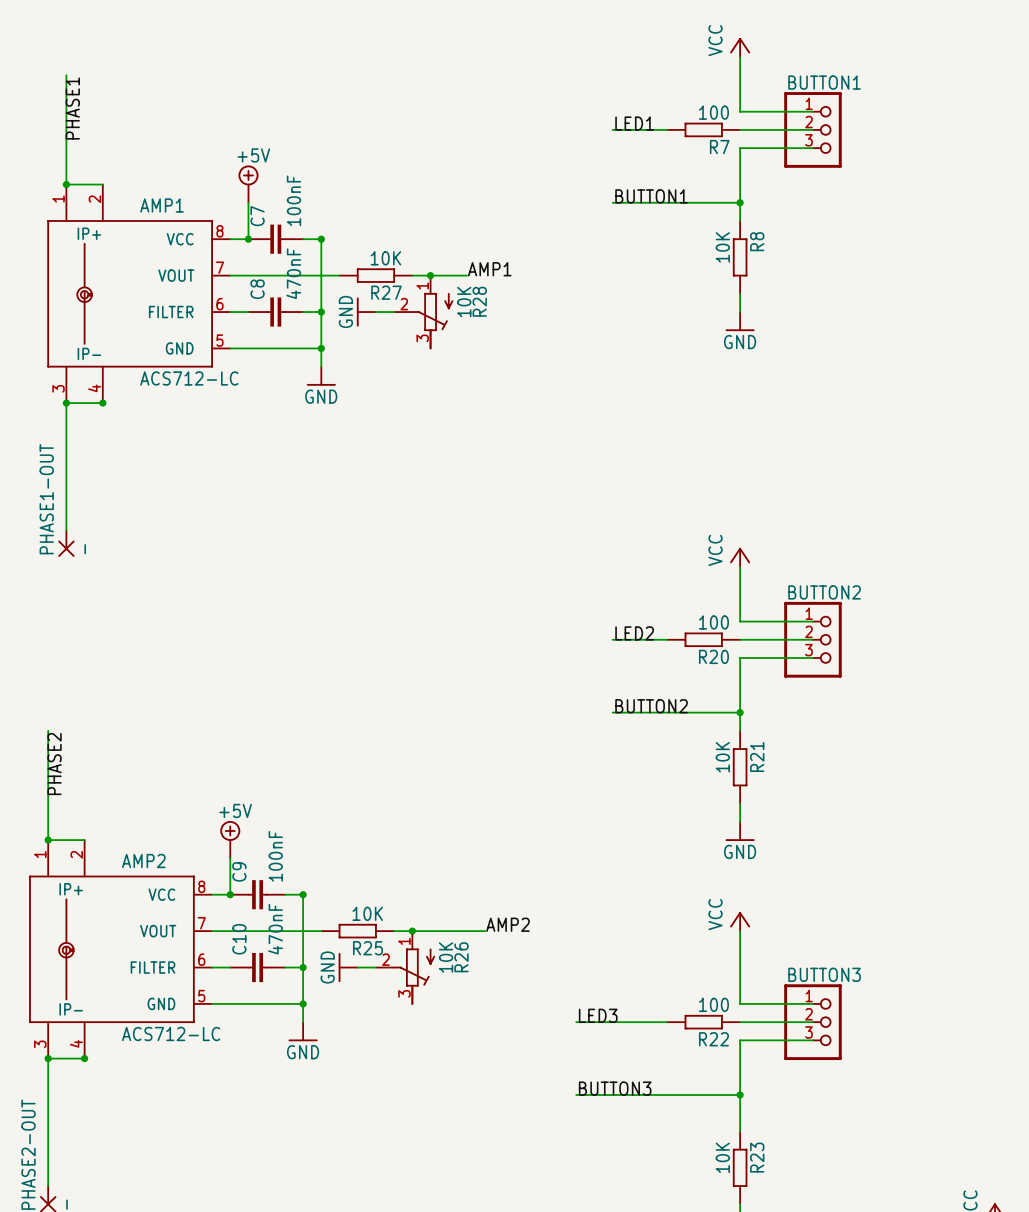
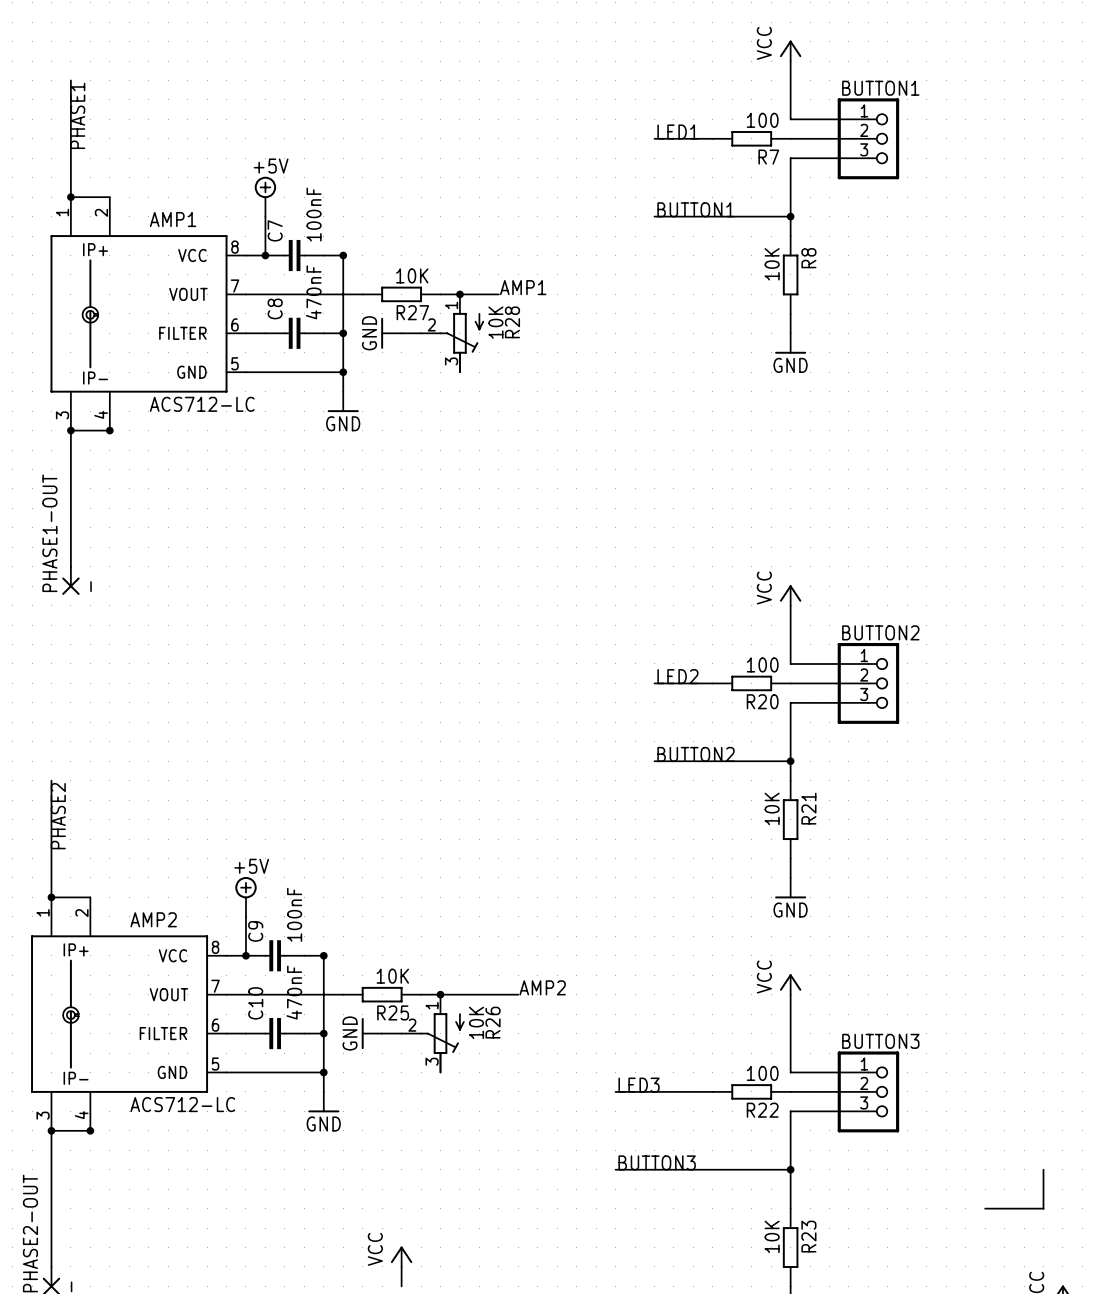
wire: none -> (1043, 1169) (1043, 1208) (985, 1208)
power symbol: none -> VCC (401, 1256)
wire: none -> (401, 1266) (401, 1286)

